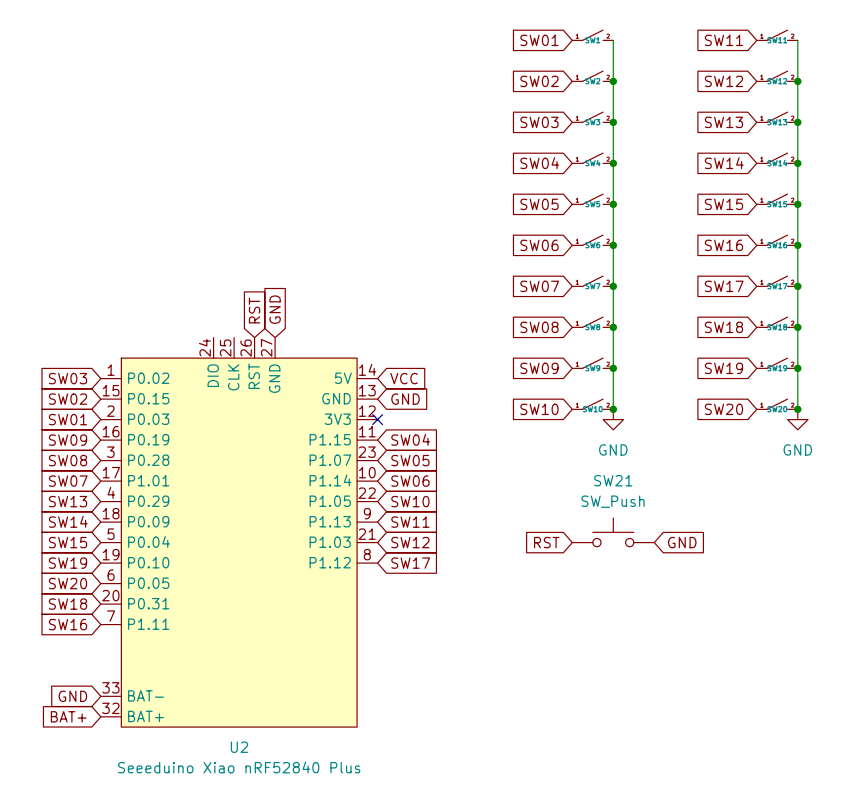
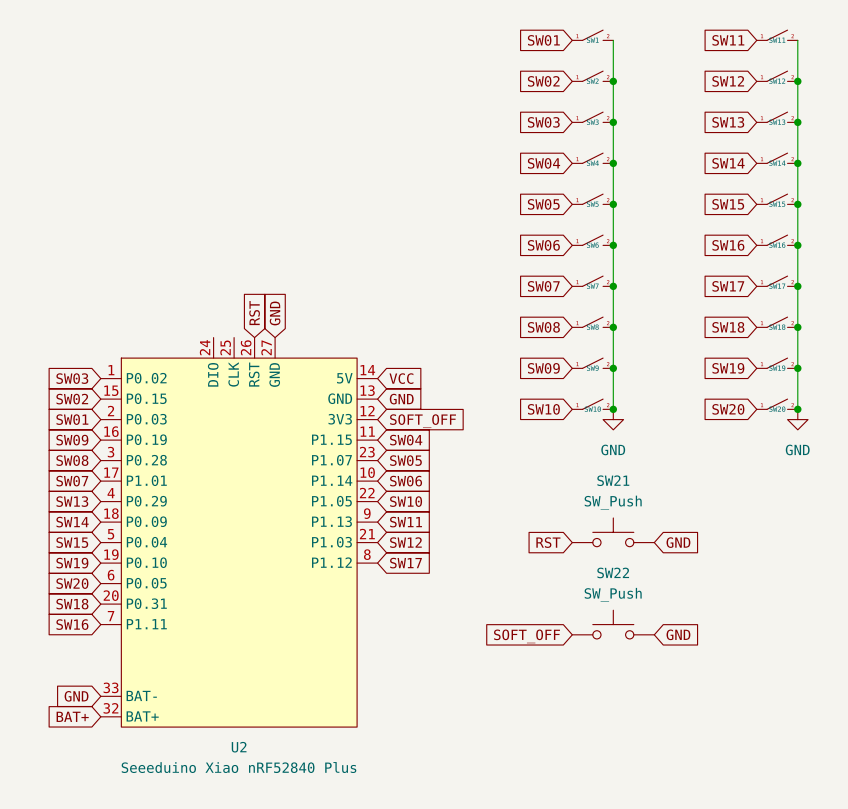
no-connect mark: (377, 419) -> none
global label: none -> SOFT_OFF (423, 421)
SW22: none -> SW_Push (613, 624)
global label: none -> GND (678, 634)
global label: none -> SOFT_OFF (526, 636)

